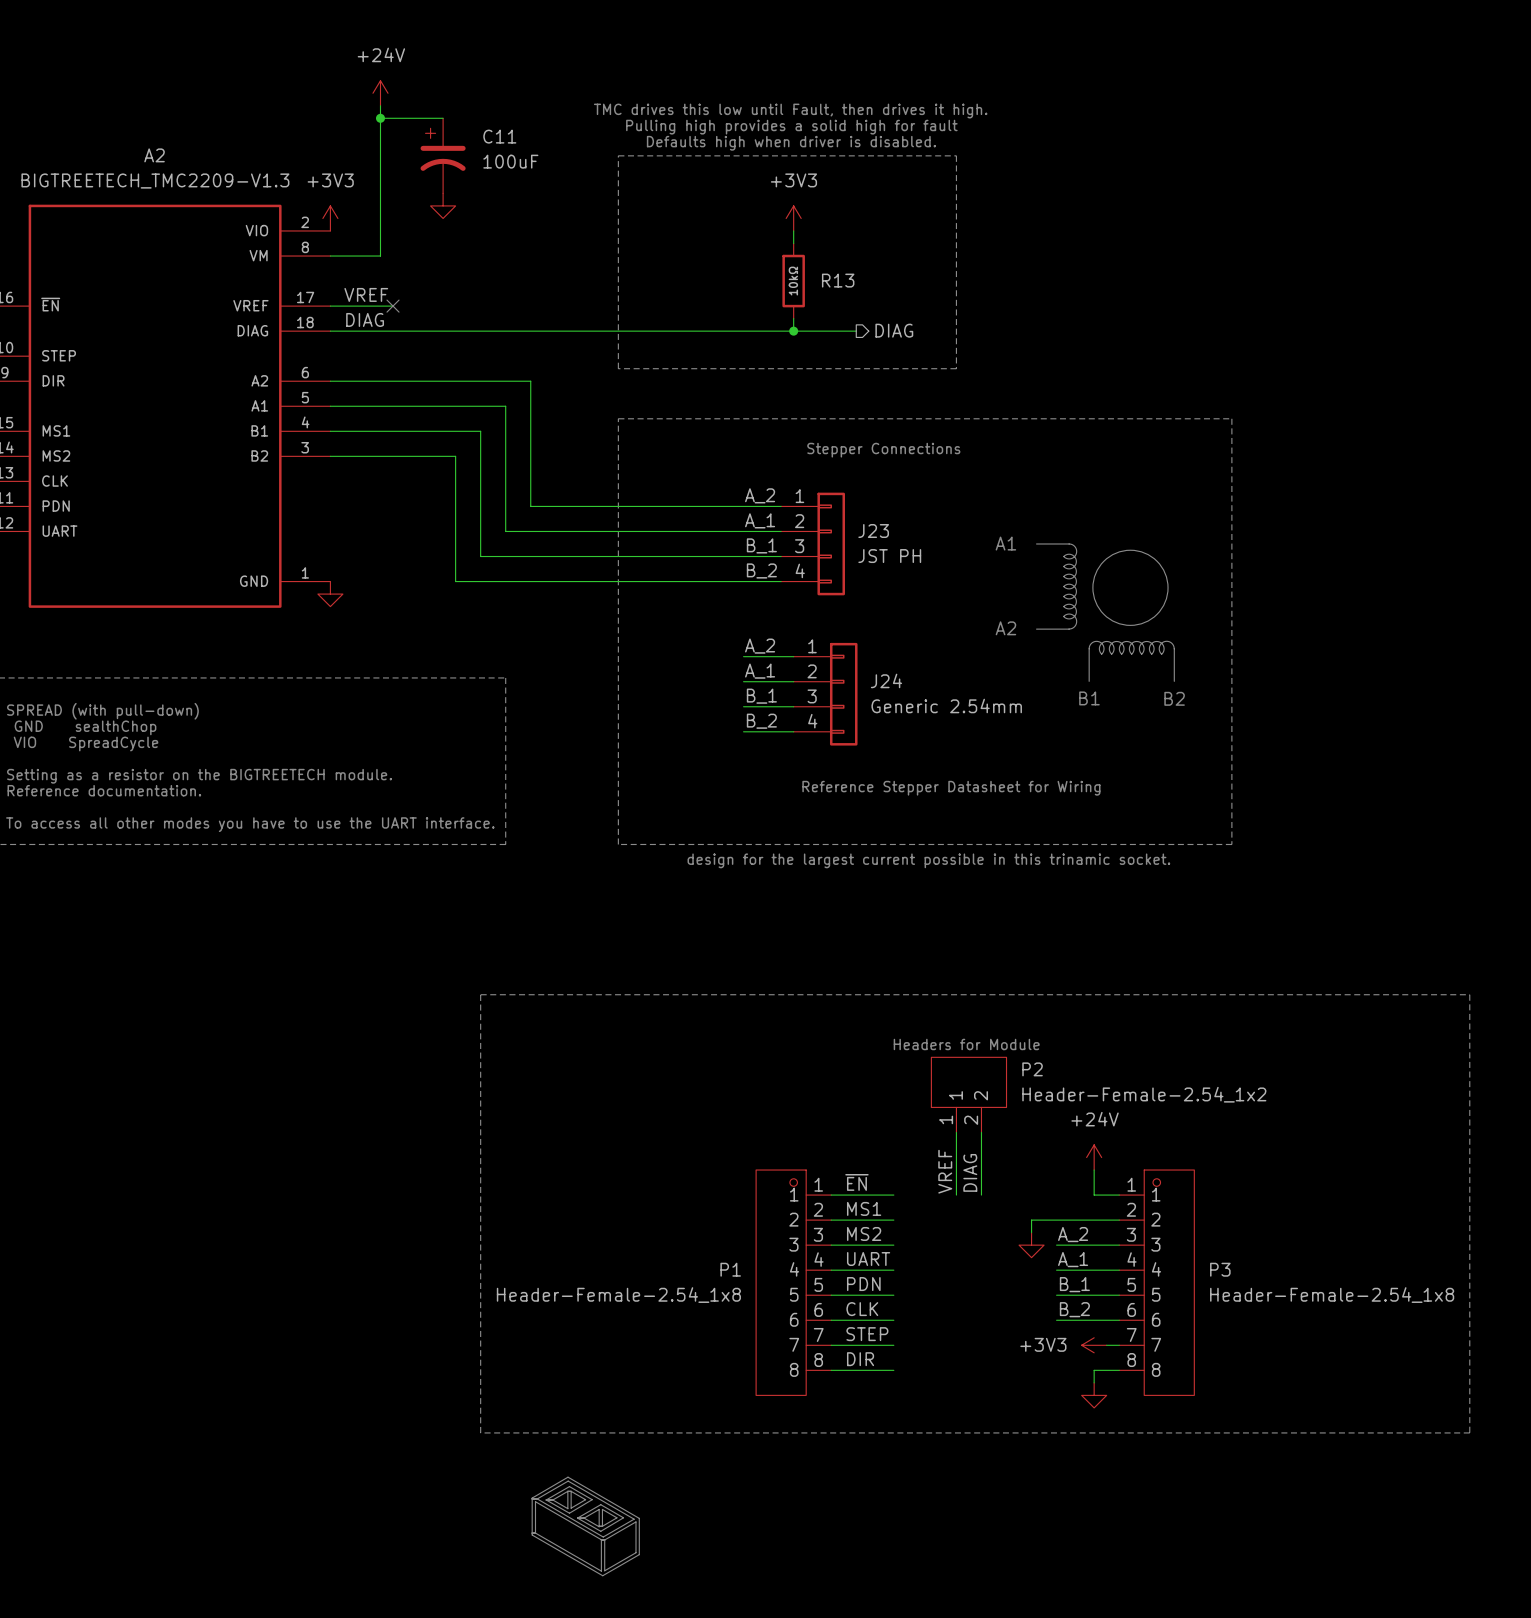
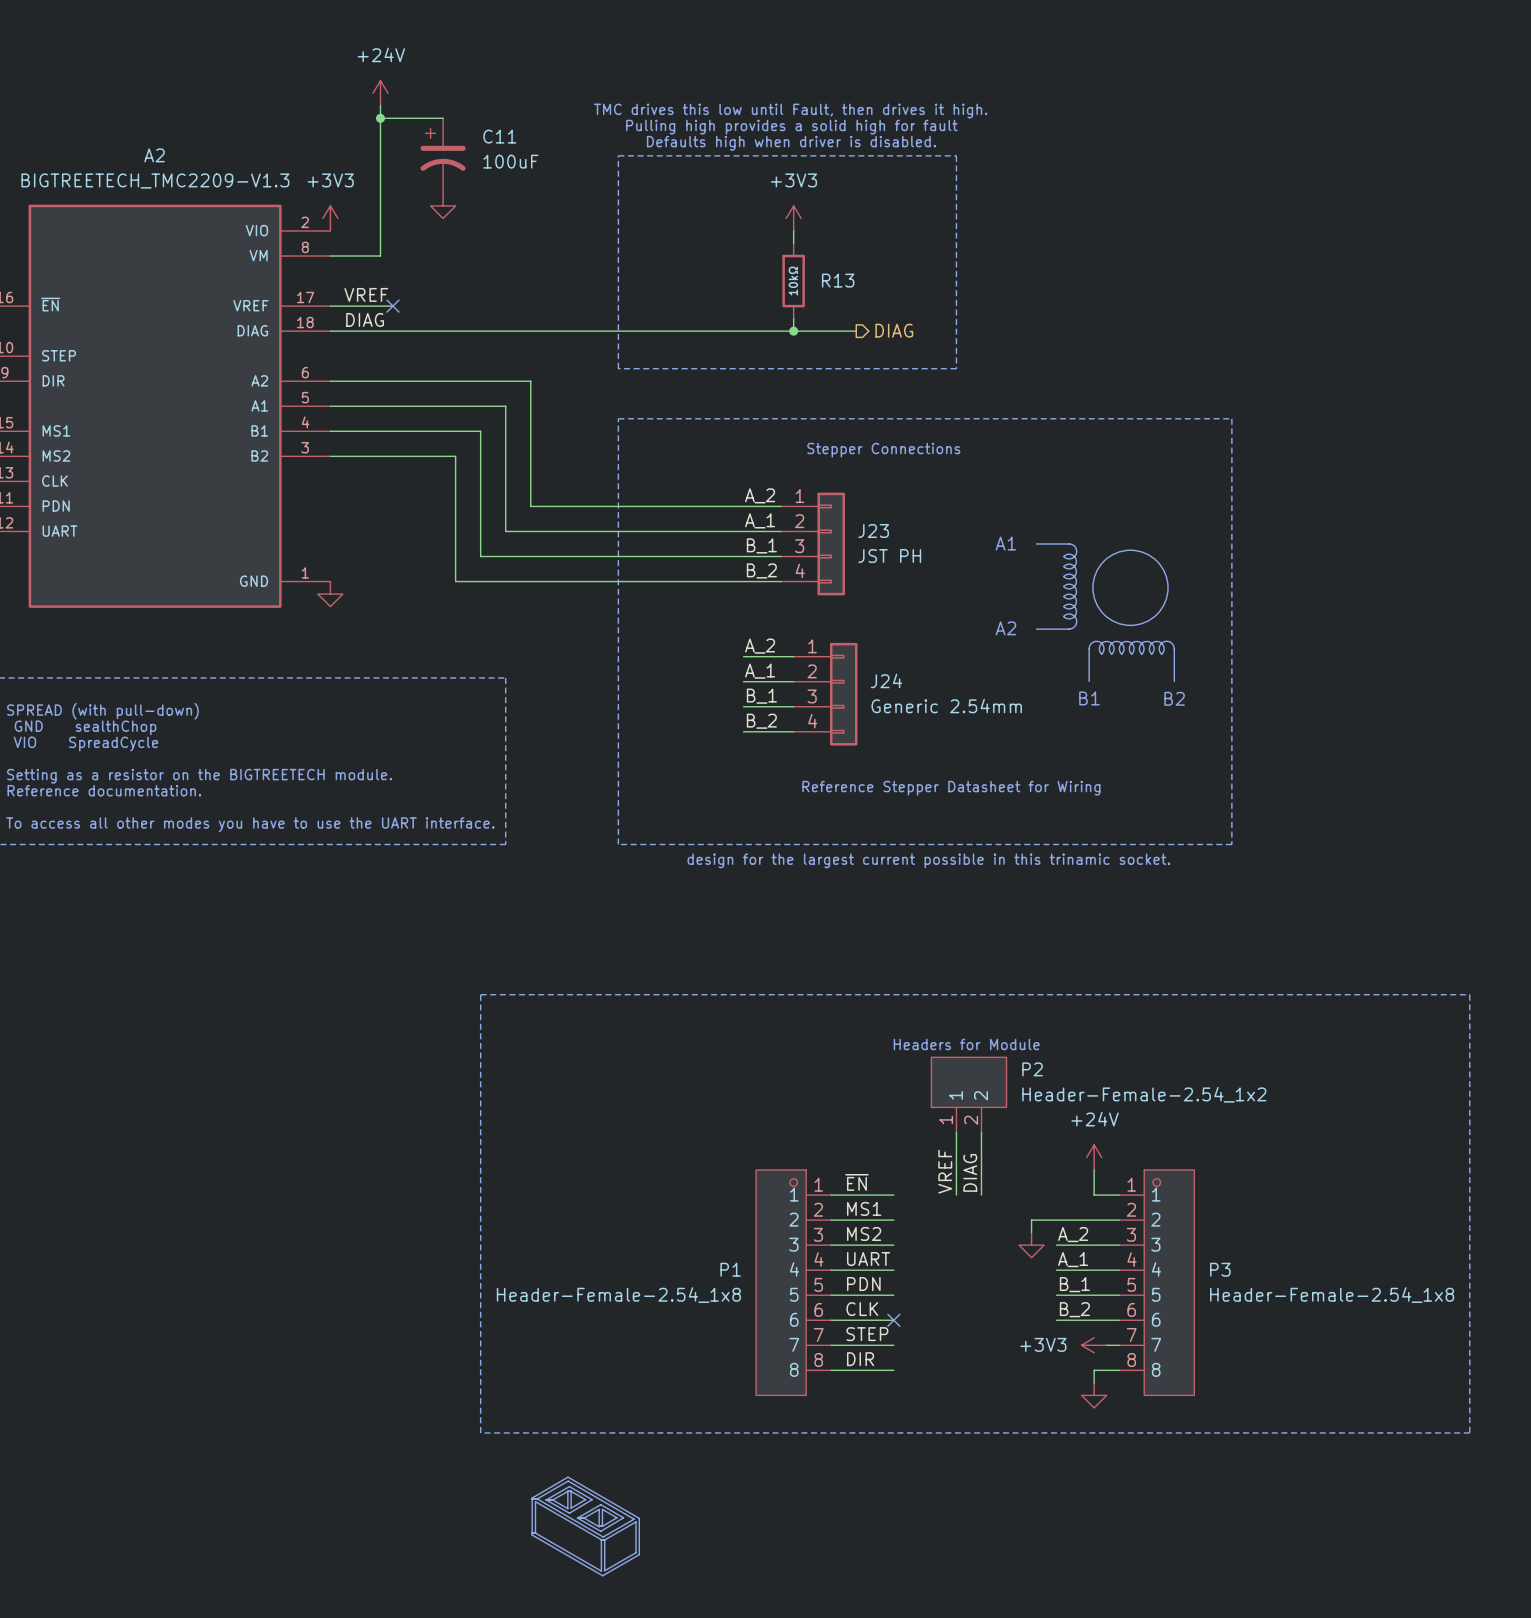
no-connect mark: none -> (893, 1320)

